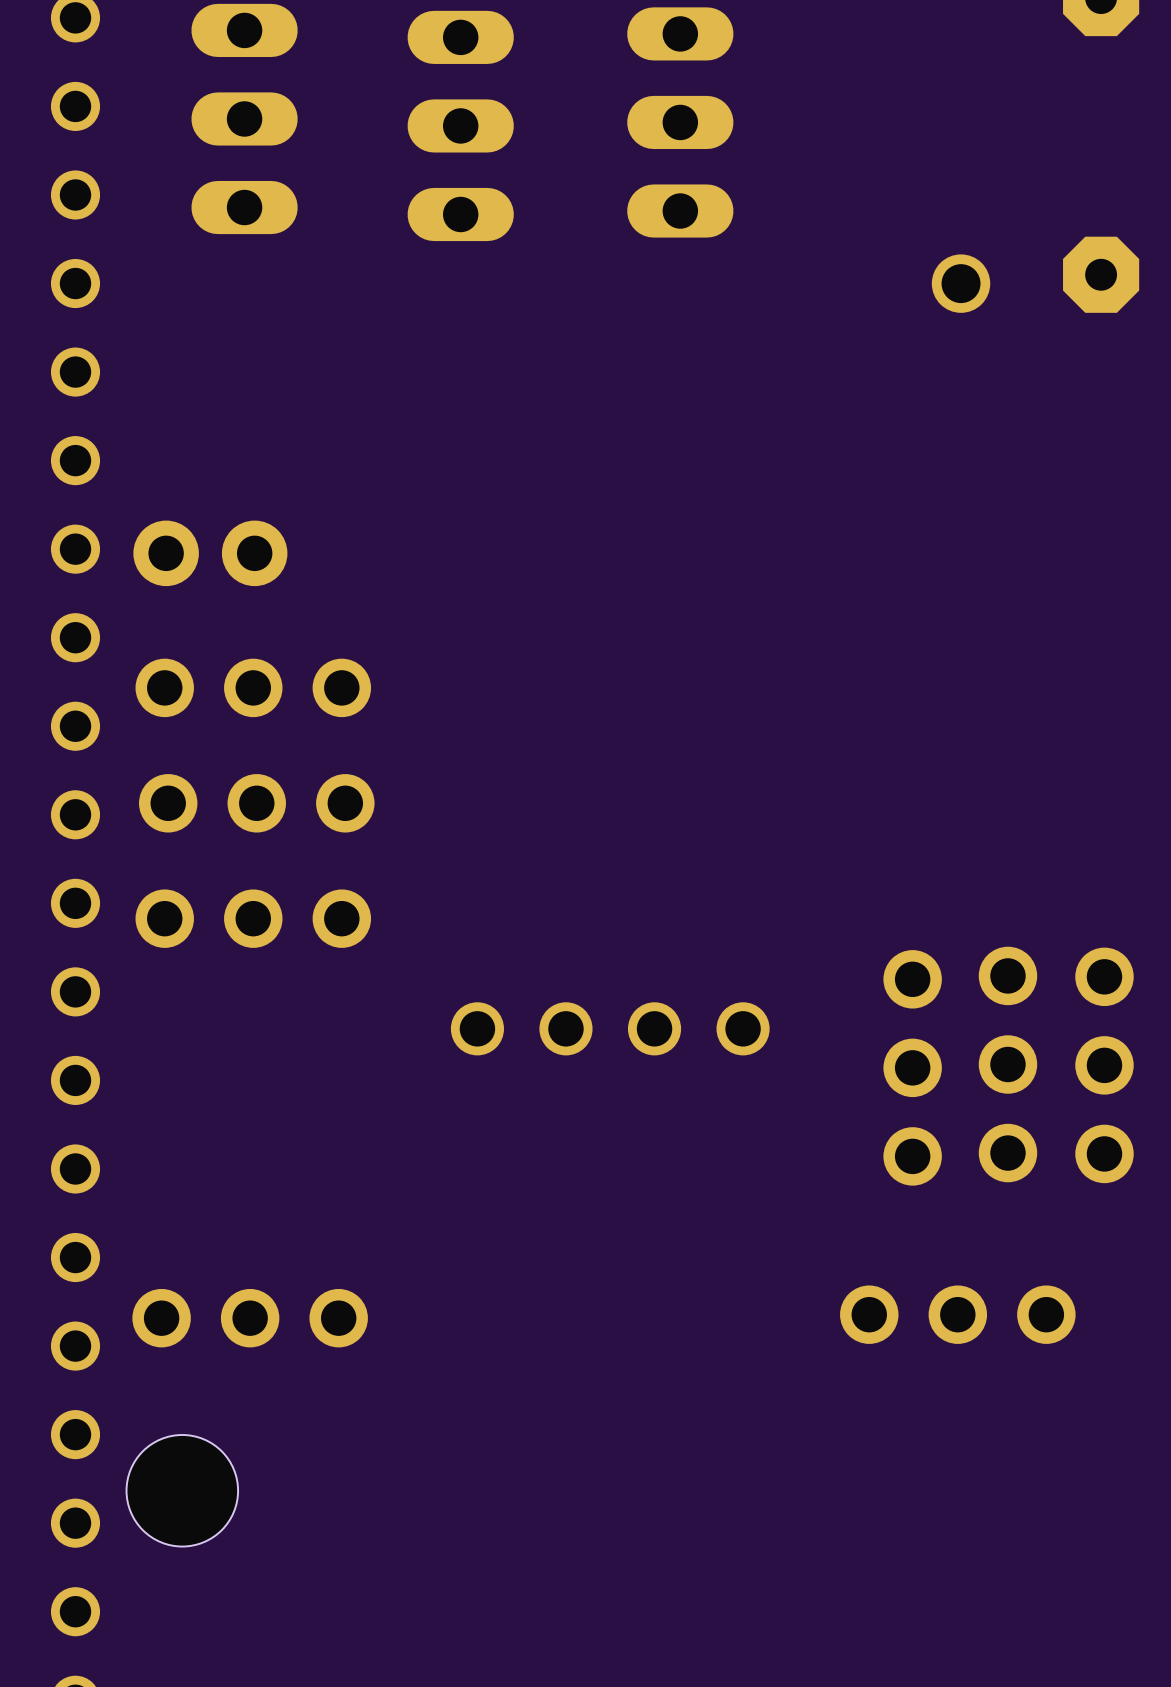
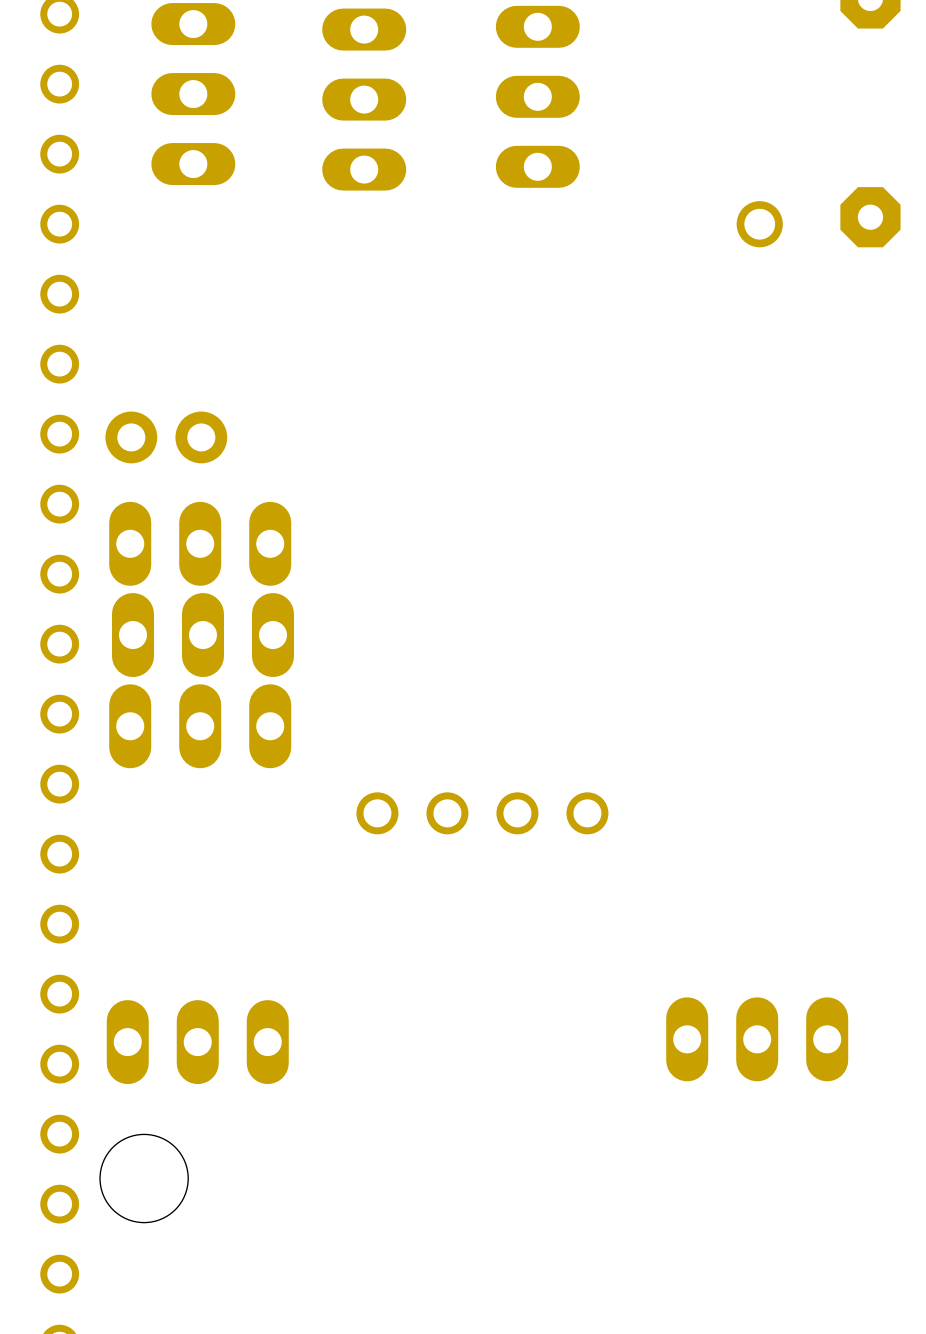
part footprint: [135, 658, 372, 718] -> [109, 501, 292, 586]
part footprint: [139, 774, 375, 833] -> [111, 593, 294, 678]
part footprint: [135, 889, 372, 948] -> [109, 684, 292, 769]
part: (1007, 1064) -> none
part: (1104, 1065) -> none
part: (912, 1067) -> none
part footprint: [840, 1285, 1076, 1344] -> [666, 997, 849, 1082]
part footprint: [132, 1288, 368, 1348] -> [106, 1000, 289, 1085]

